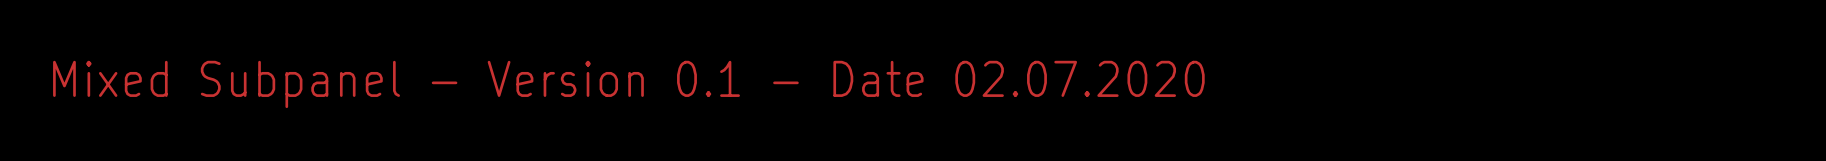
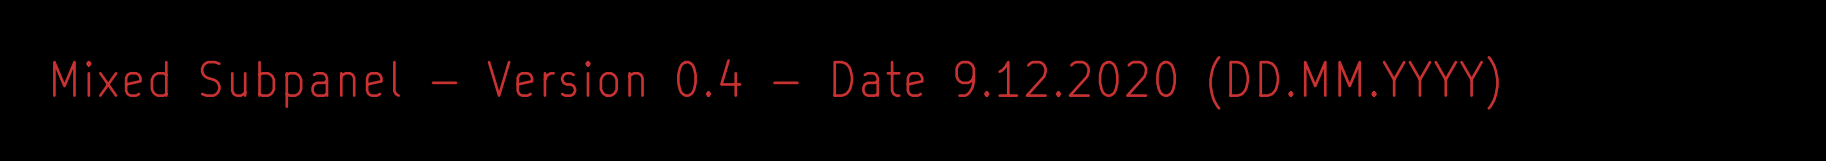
text: Mixed Subpanel - Version 0.1 - Date 02.07.2020 (628, 84) -> Mixed Subpanel - Version 0.4 - Date 9.12.2020 (DD.MM.YYYY) (775, 82)

